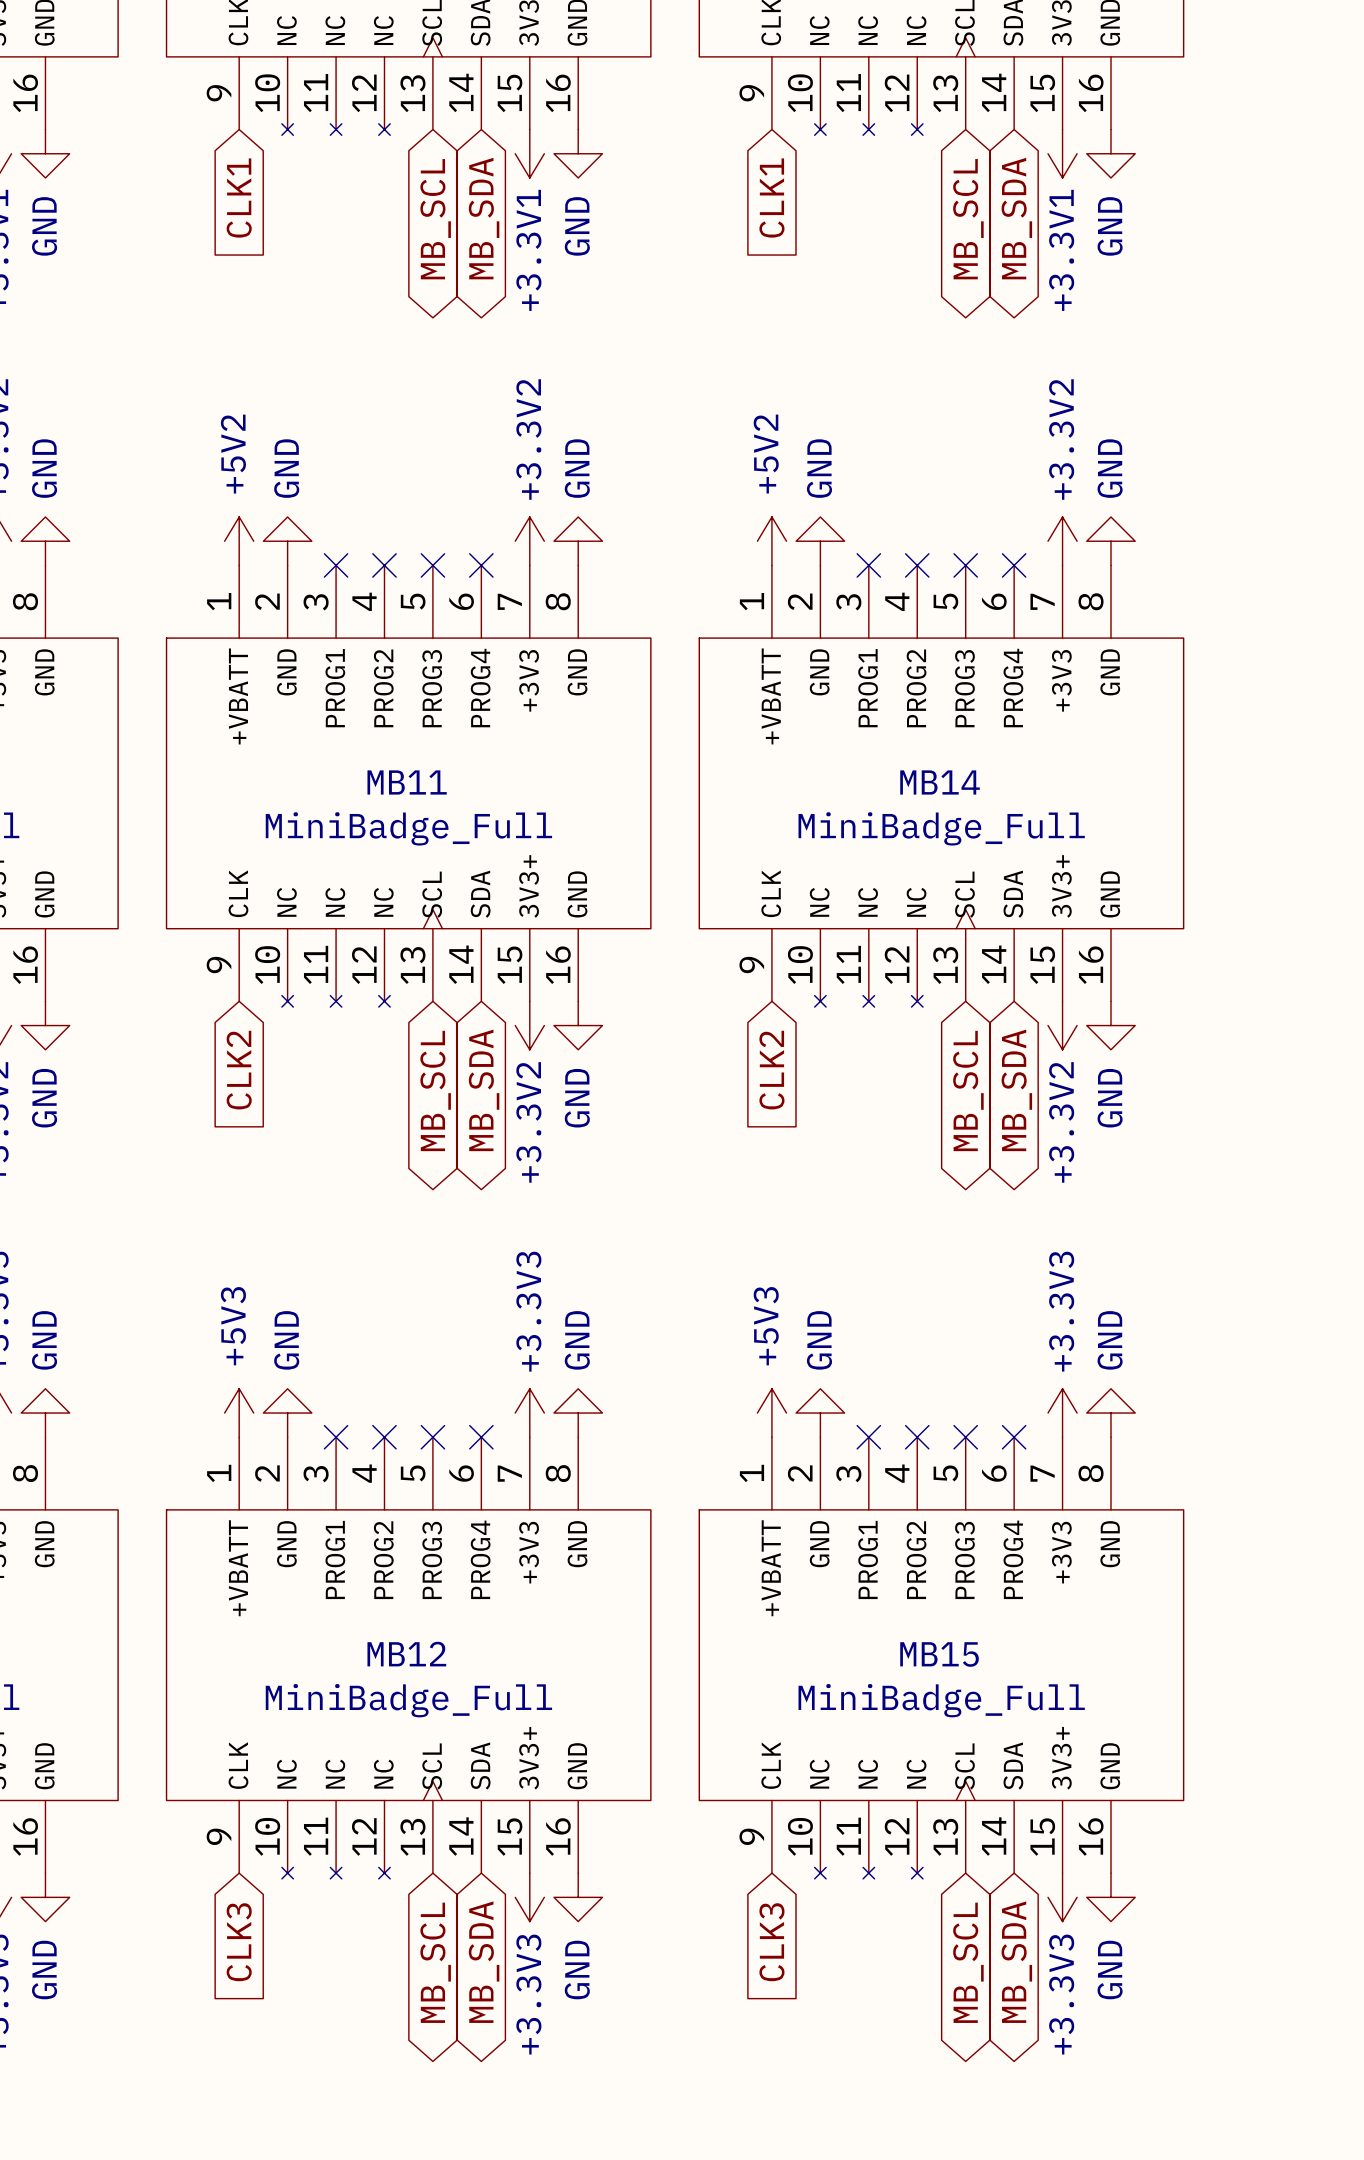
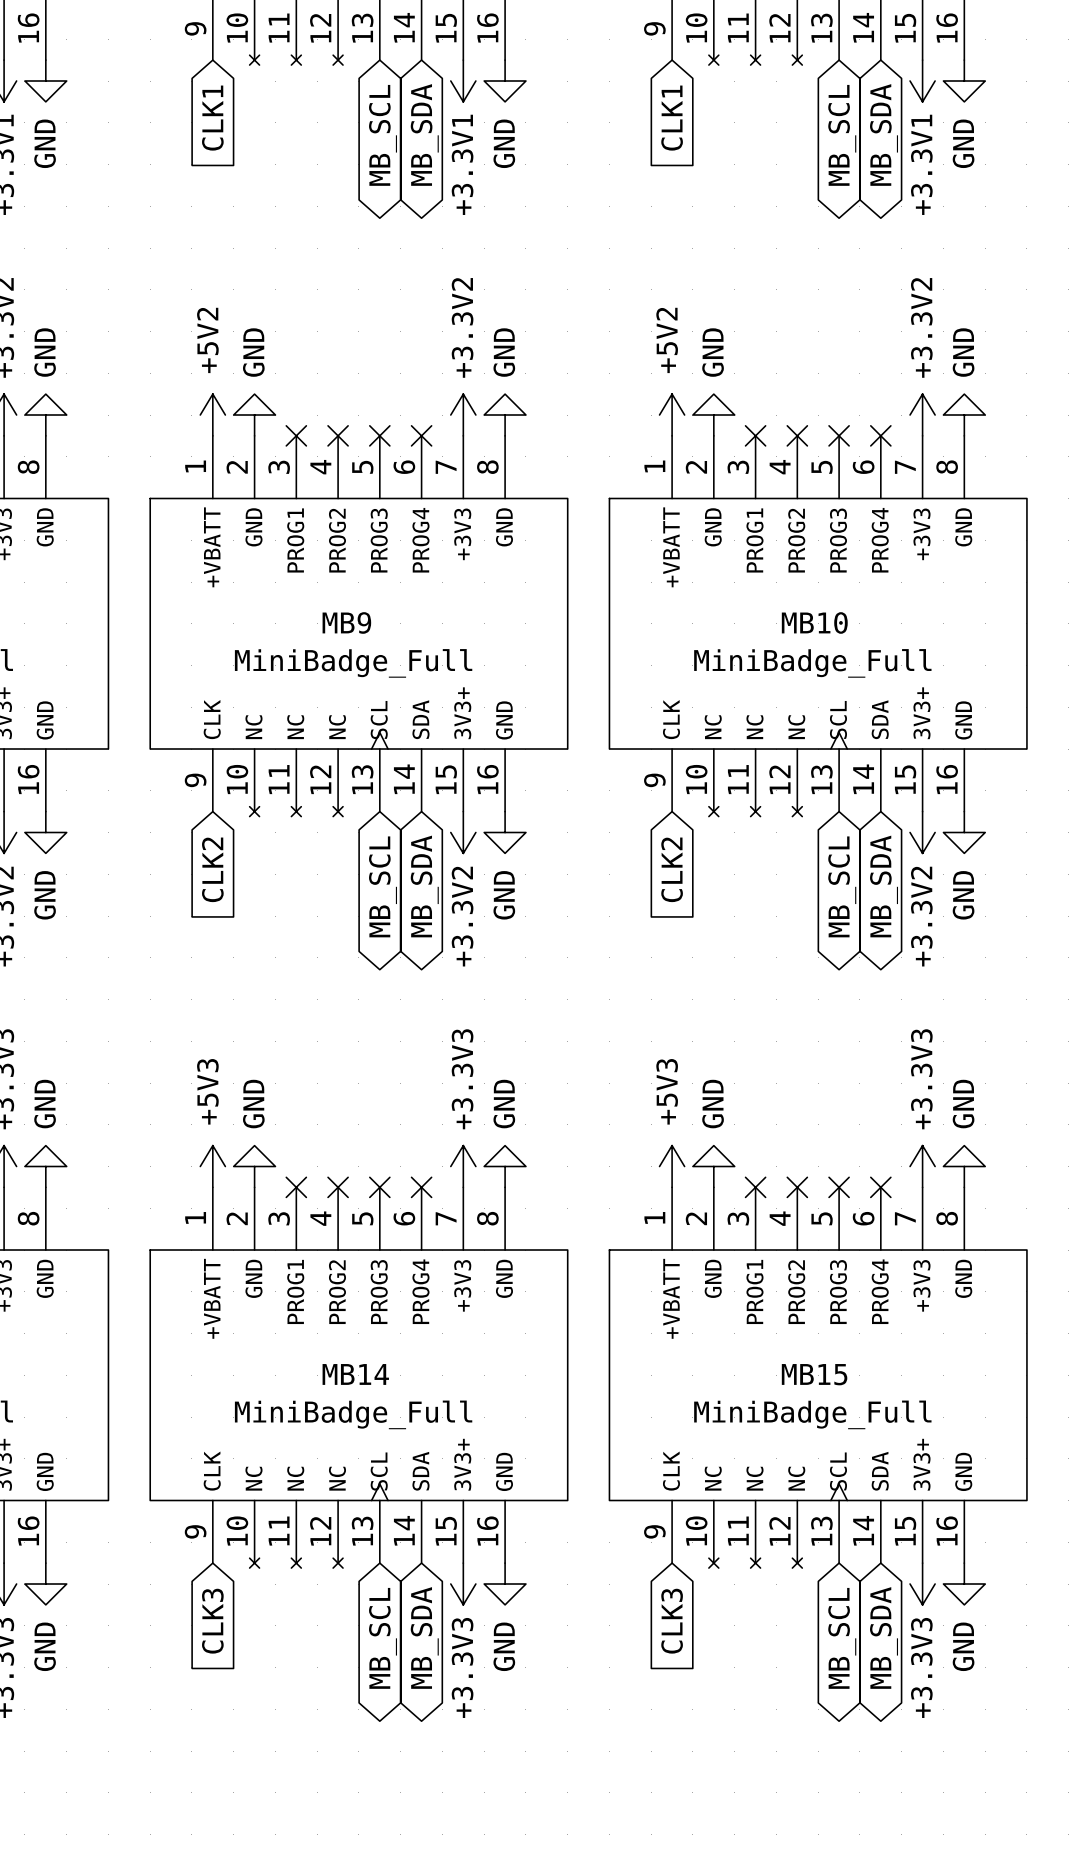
MB11 name: MB11 (407, 782) -> MB9 (346, 622)
MB14 name: MB14 (940, 782) -> MB10 (814, 622)
MB12 name: MB12 (406, 1654) -> MB14 (355, 1374)

